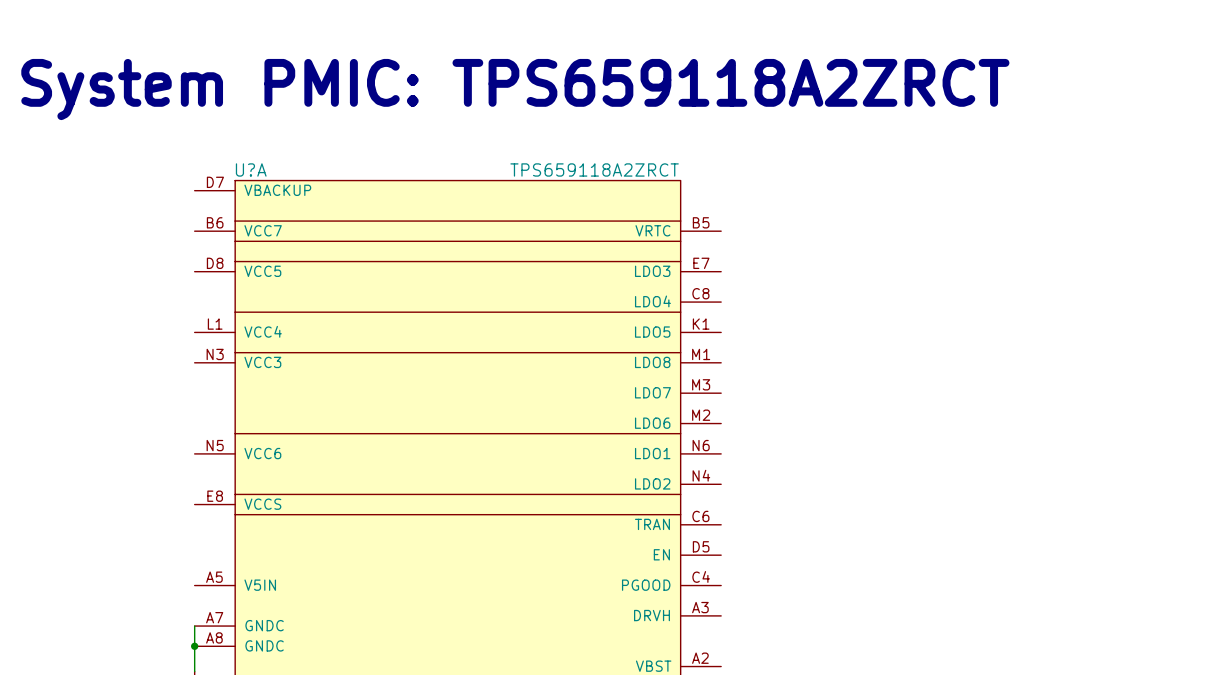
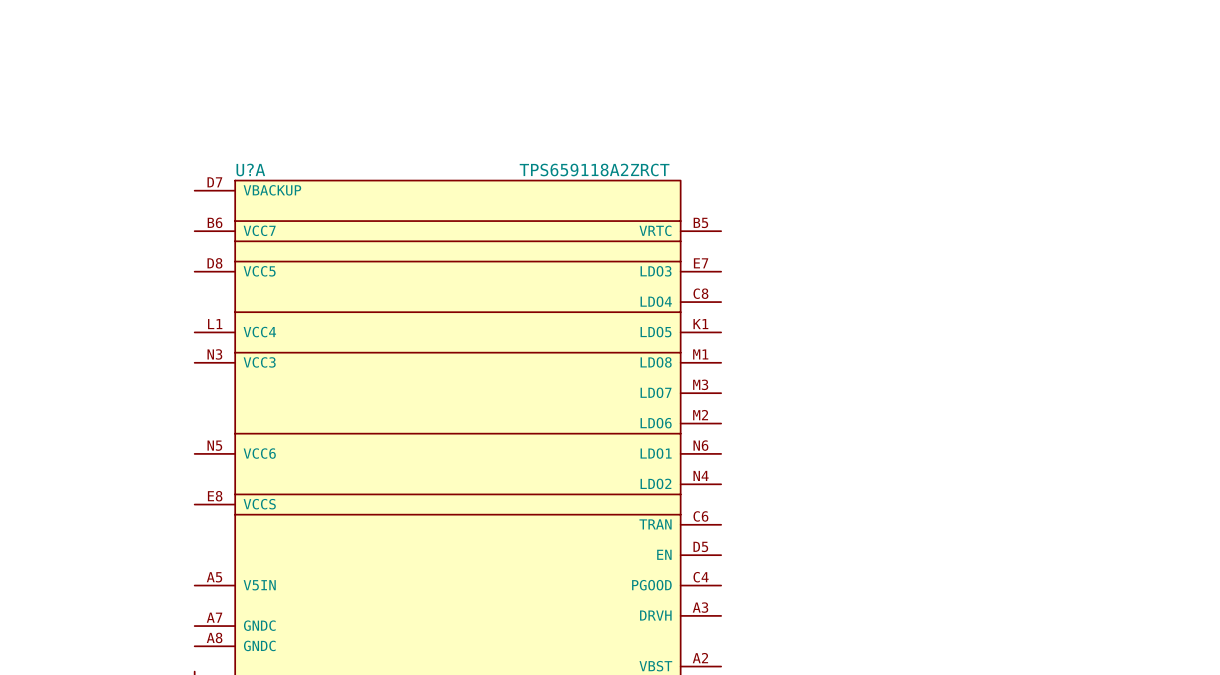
text: System PMIC: TPS659118A2ZRCT (515, 89) -> none
wire: (194, 626) (194, 671) -> none
junction: (194, 646) -> none

